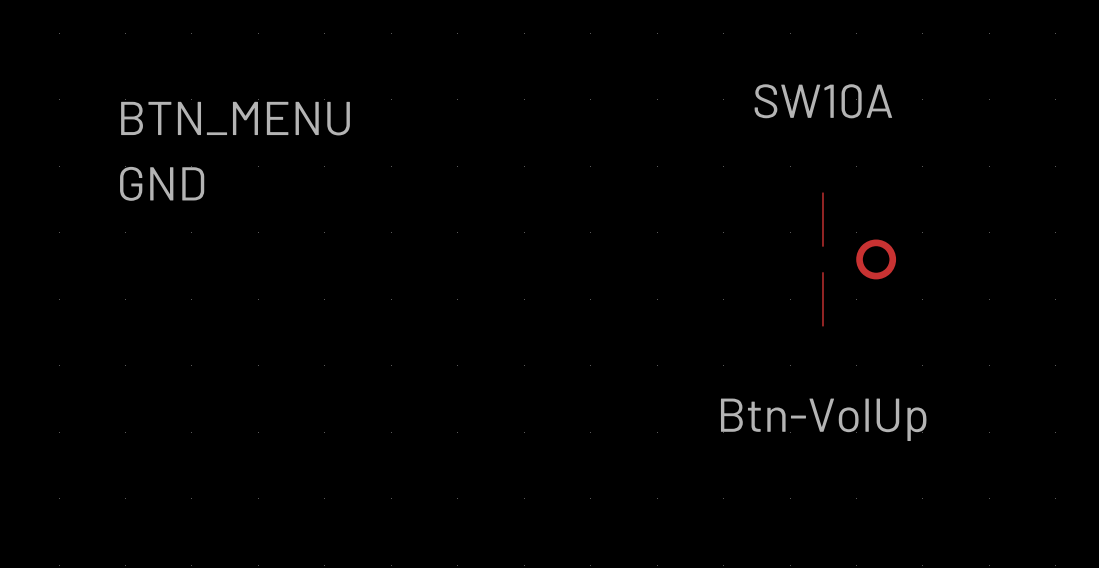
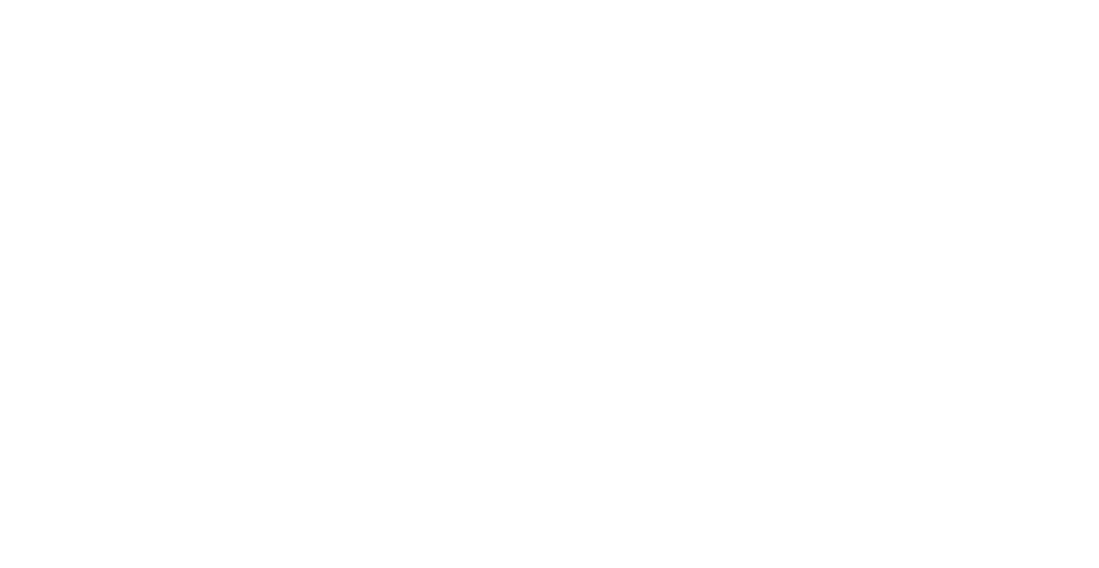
label: BTN_MENU (235, 118) -> none
label: GND (162, 183) -> none
SW10A: Btn-VolUp (859, 259) -> none

